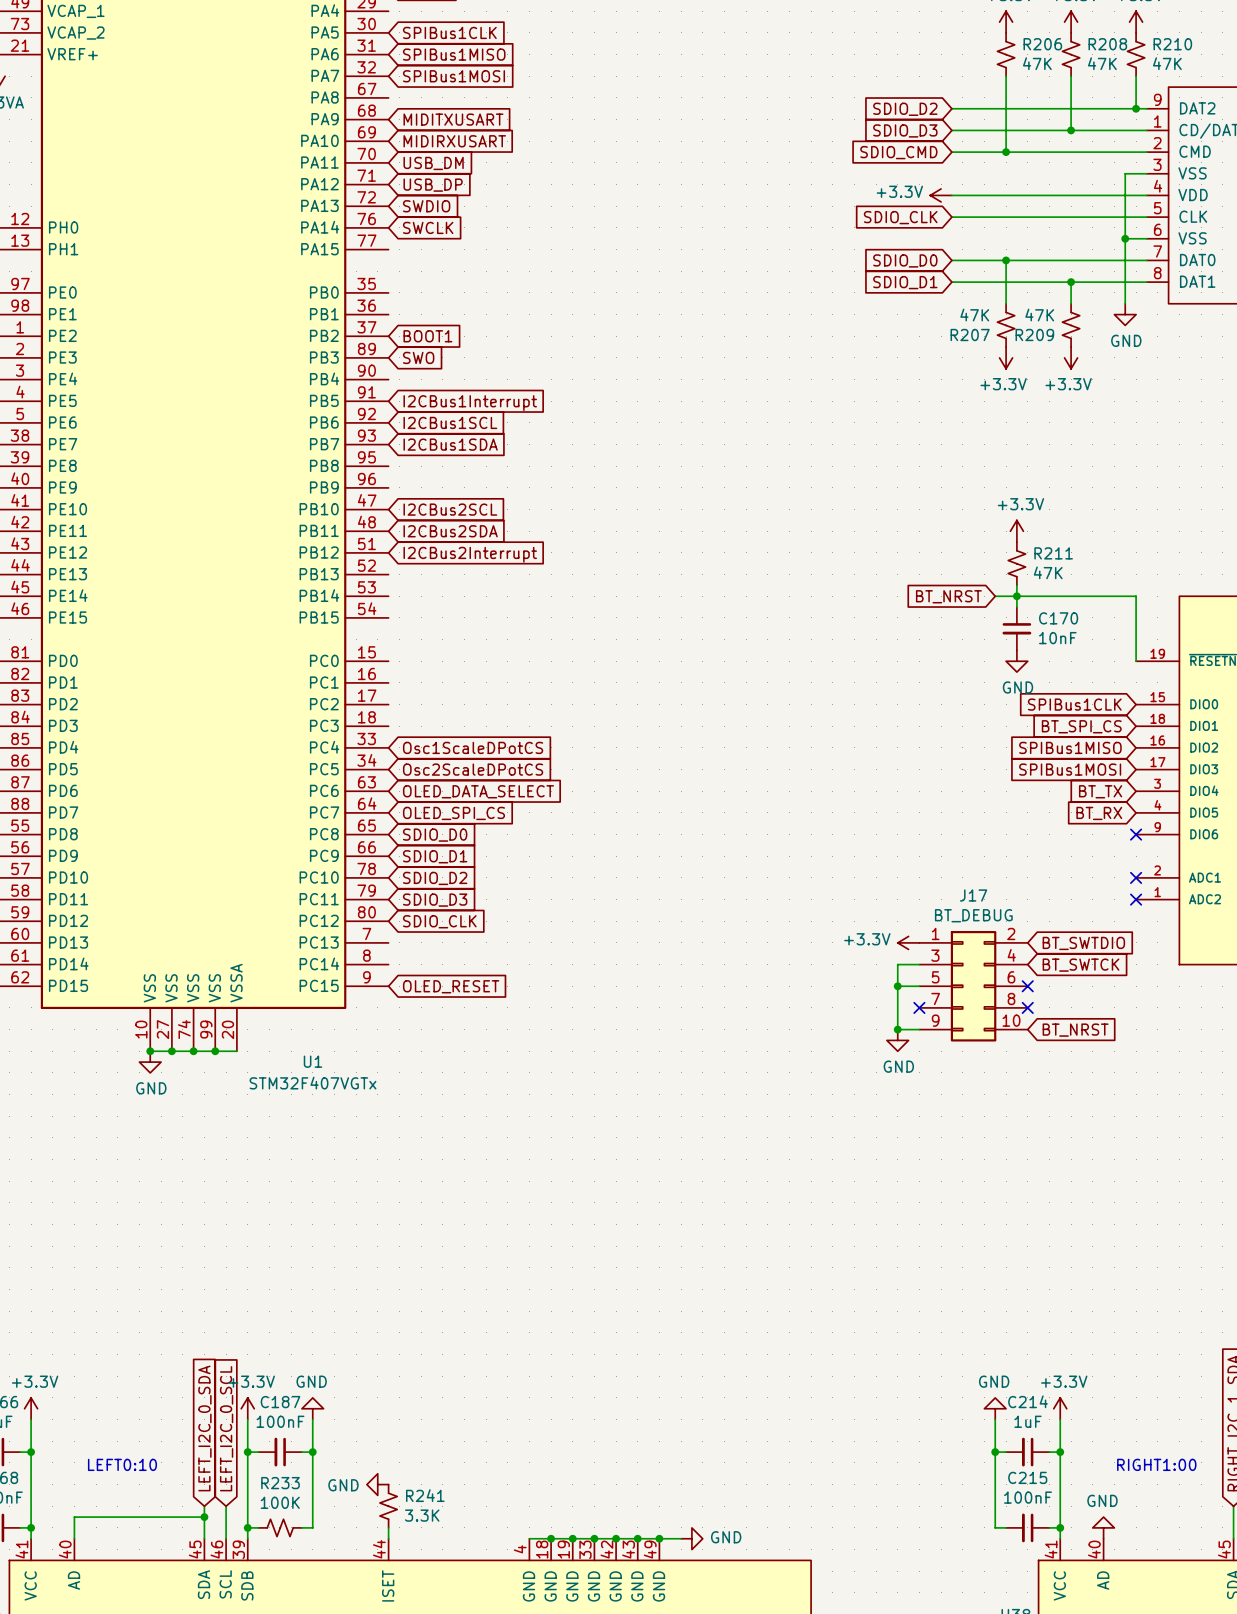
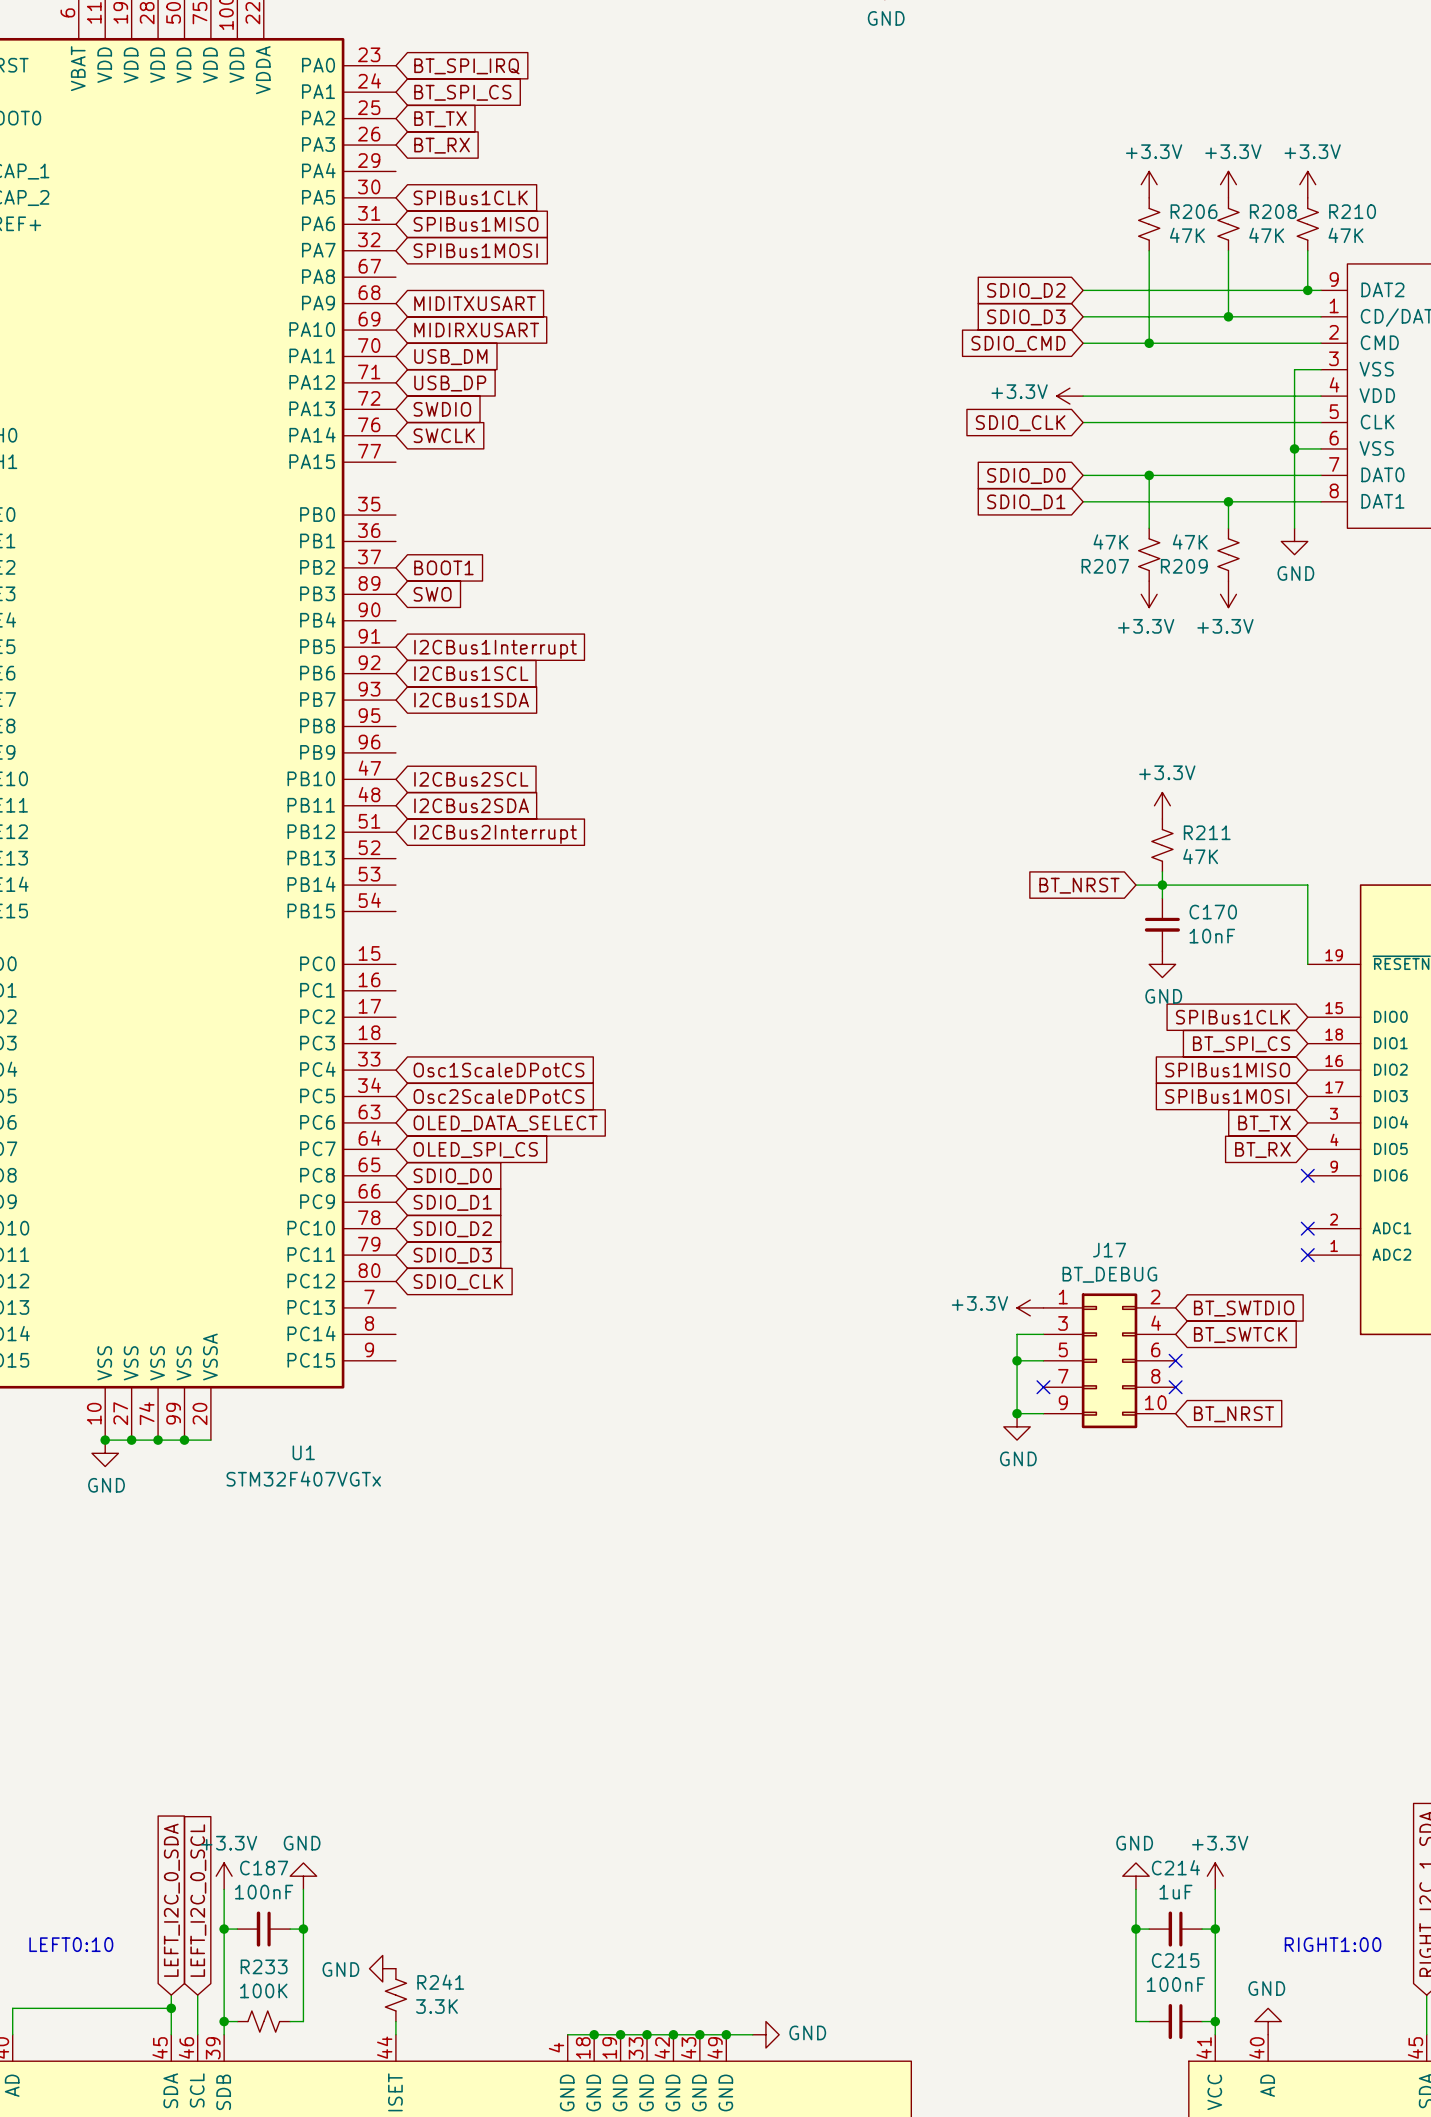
global label: OLED_RESET (451, 986) -> none

